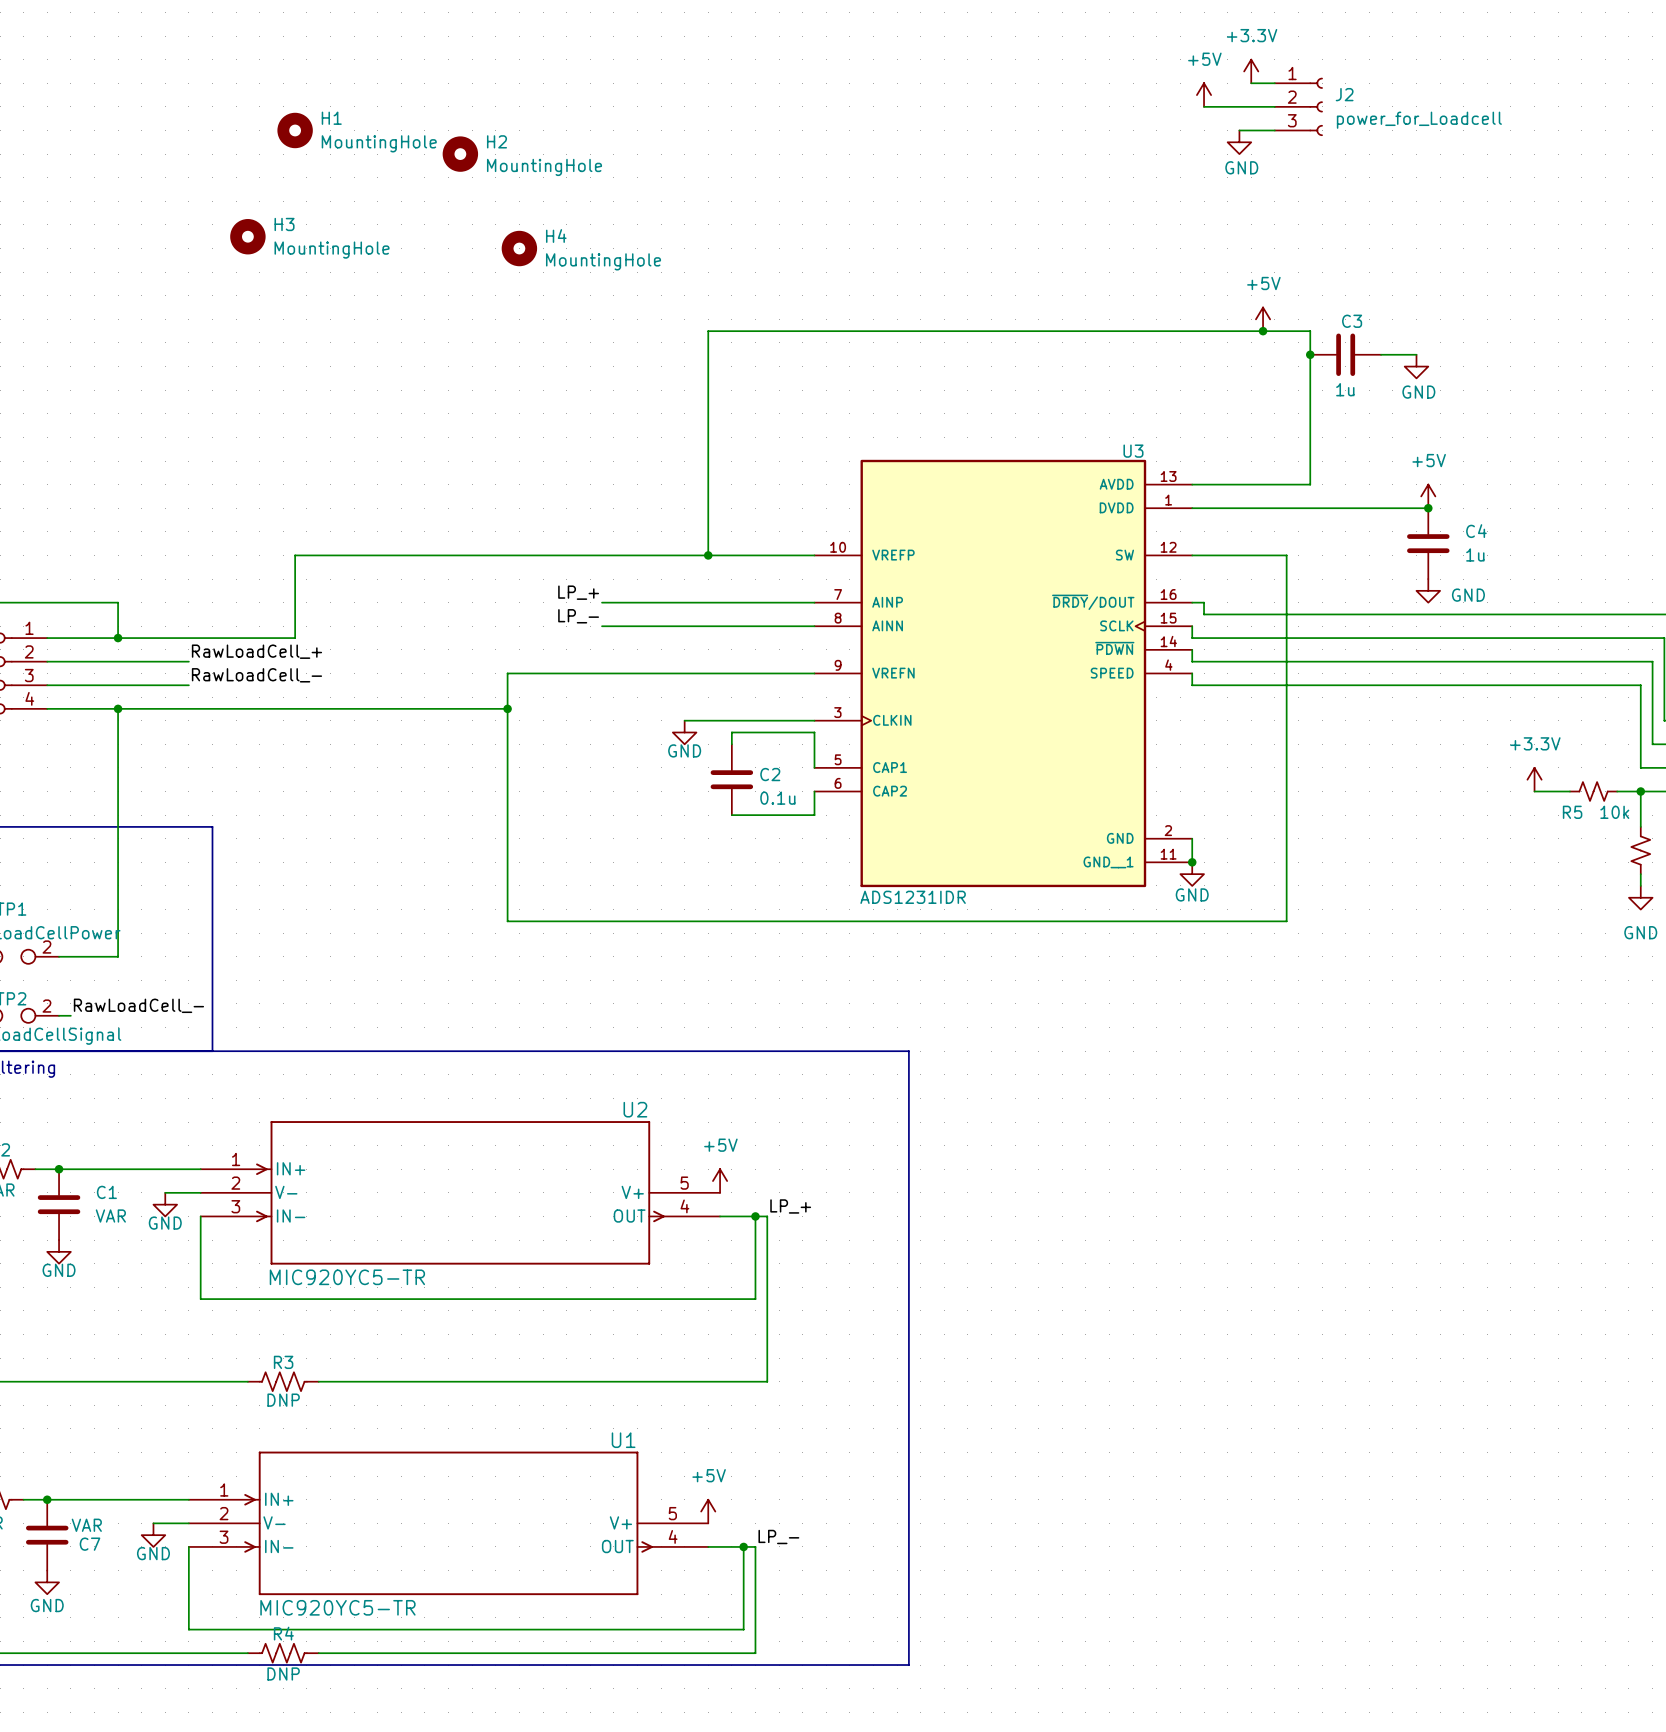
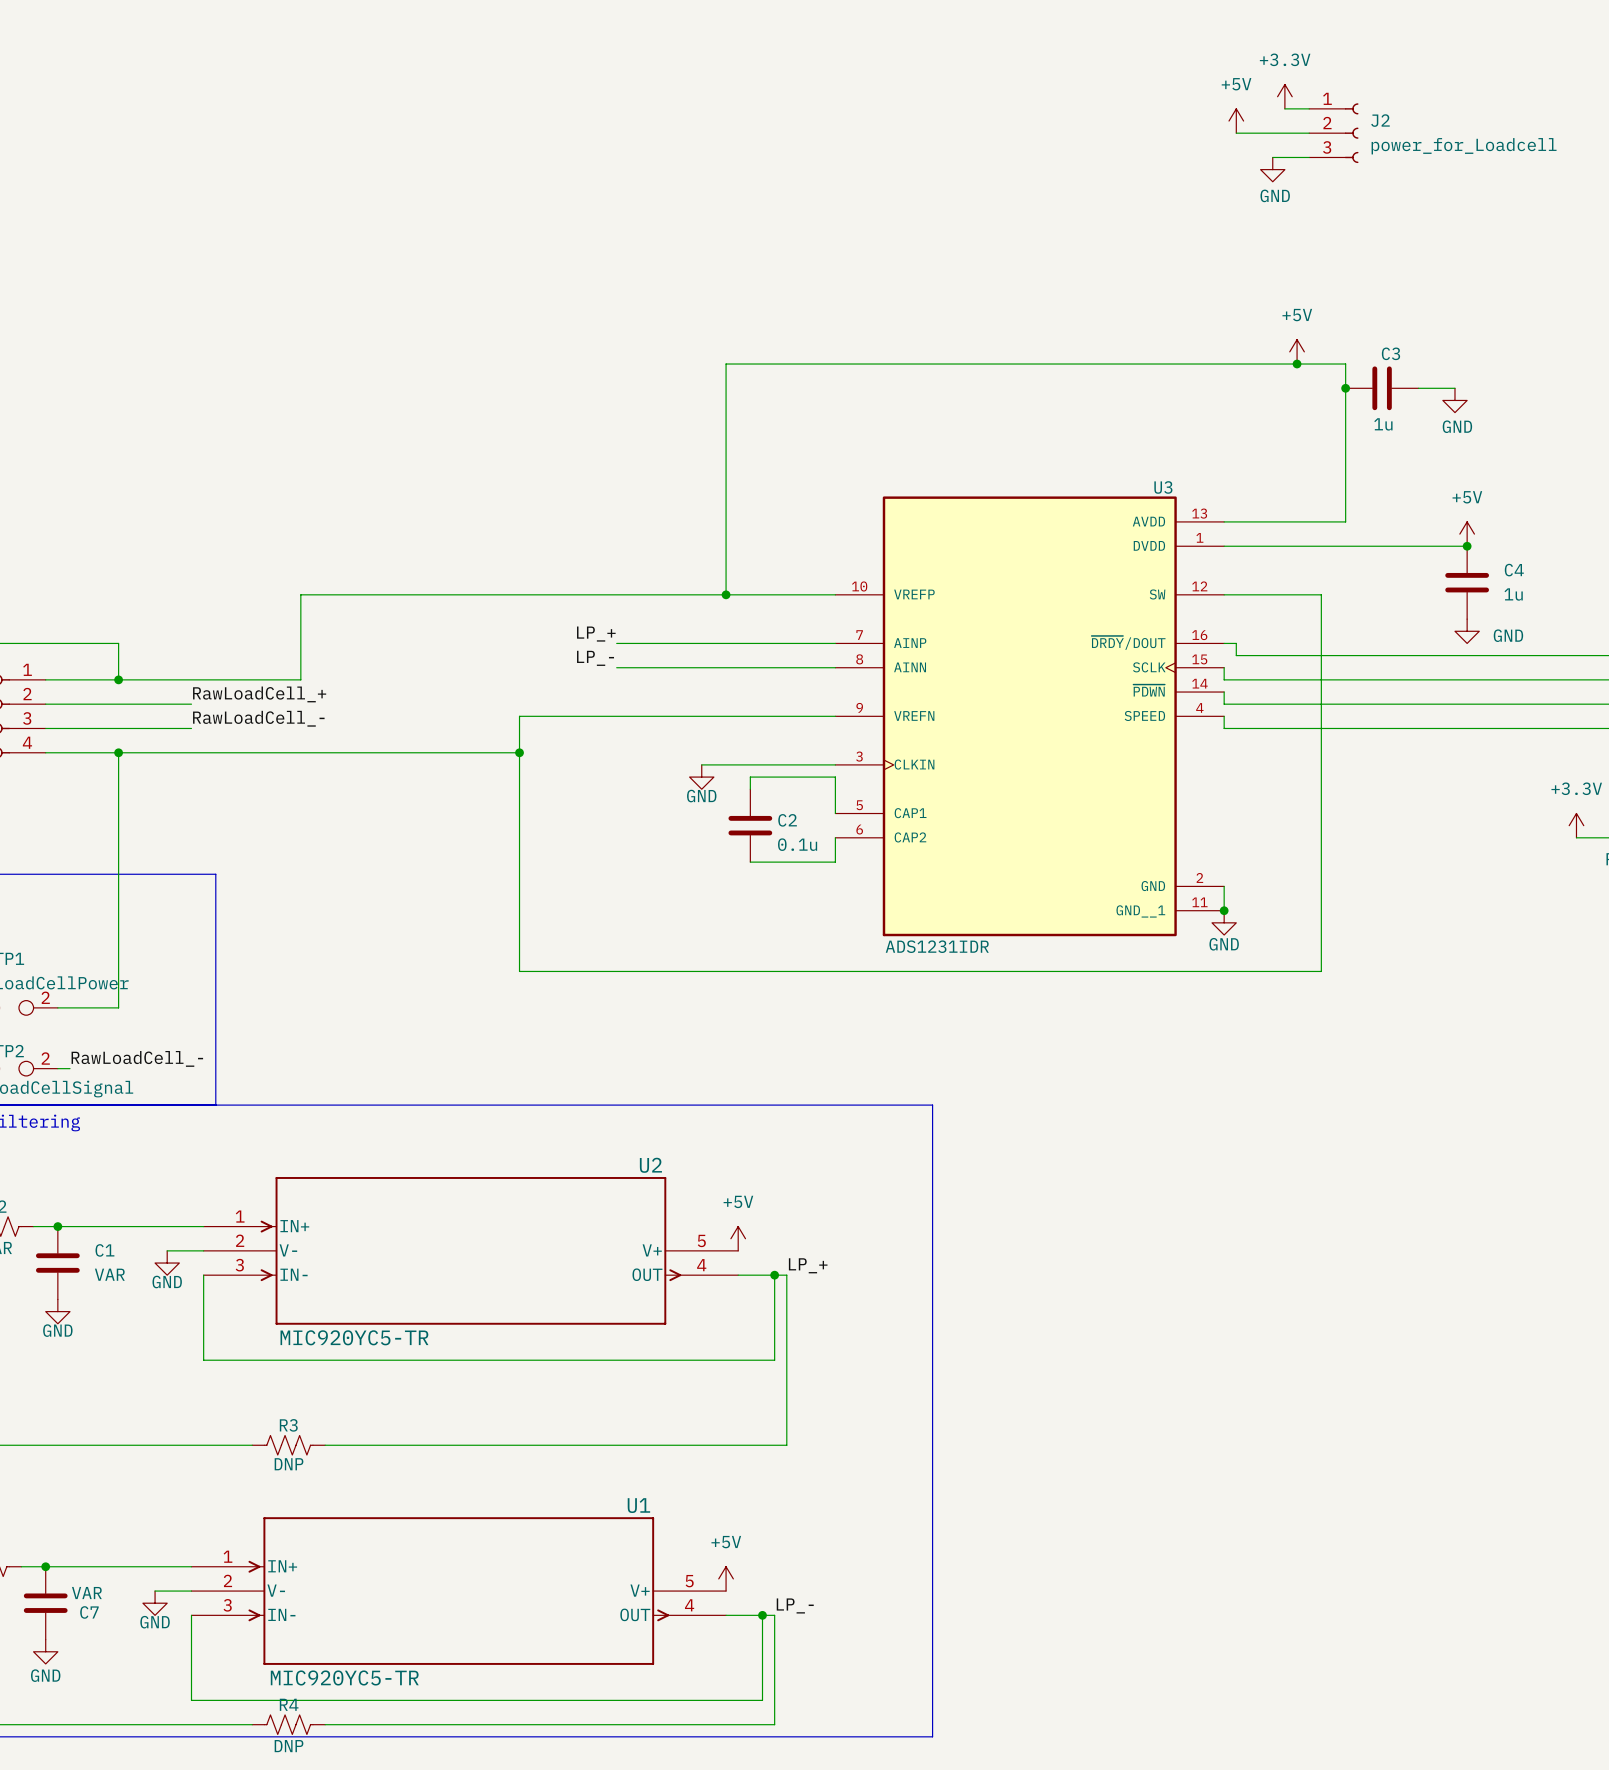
H1: MountingHole (295, 130) -> none
H2: MountingHole (460, 154) -> none
H3: MountingHole (247, 236) -> none
H4: MountingHole (519, 248) -> none

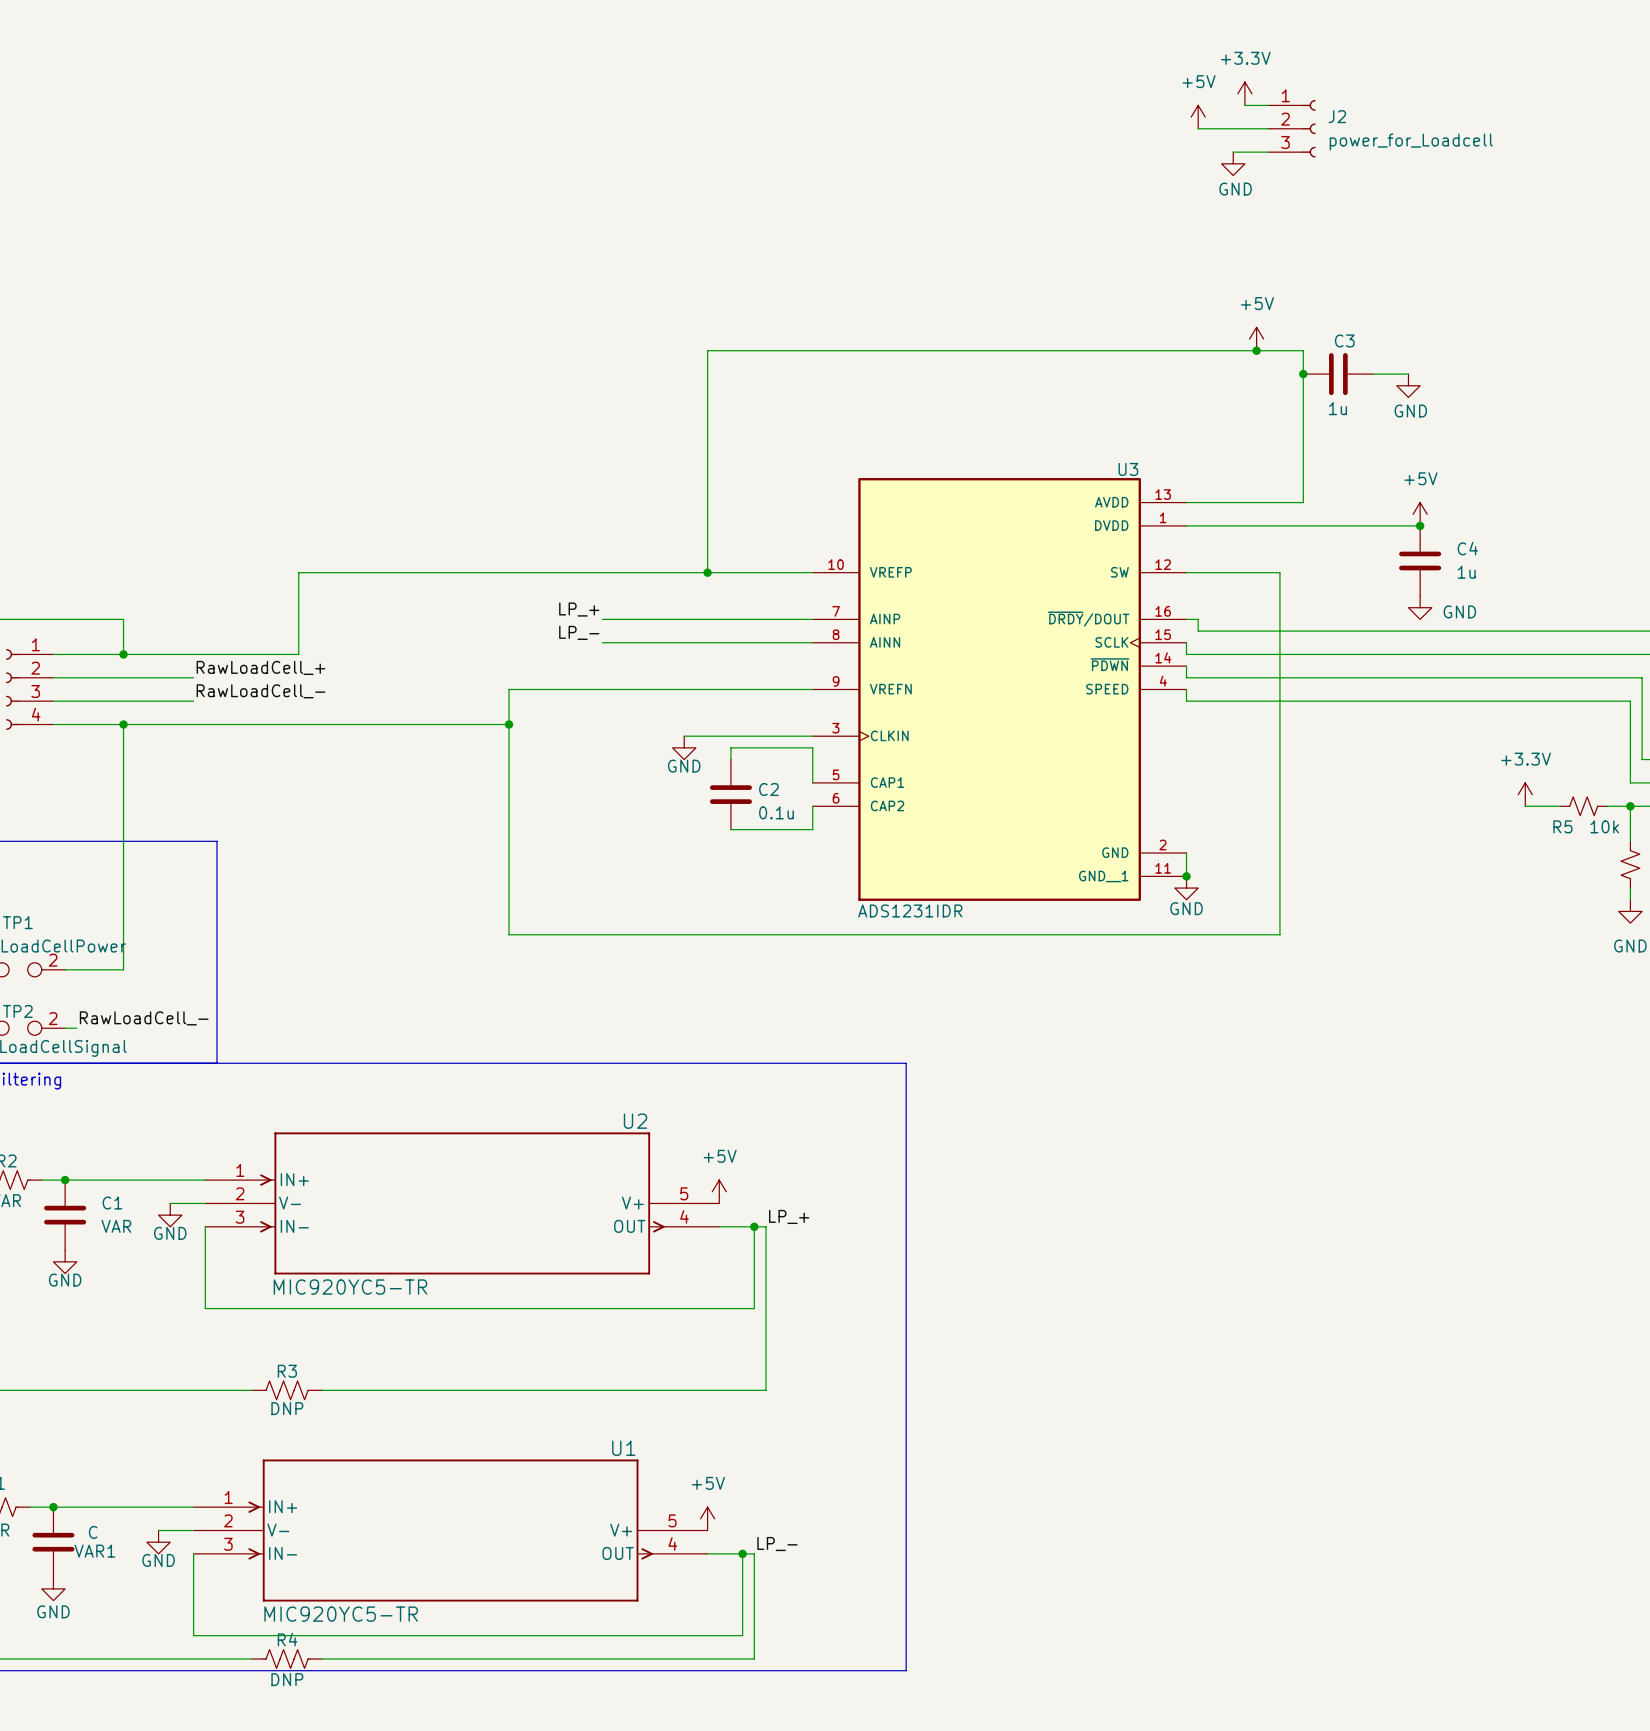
C7 value: VAR (86, 1593) -> C (93, 1532)
C7 name: C7 (89, 1612) -> VAR1 (94, 1551)

